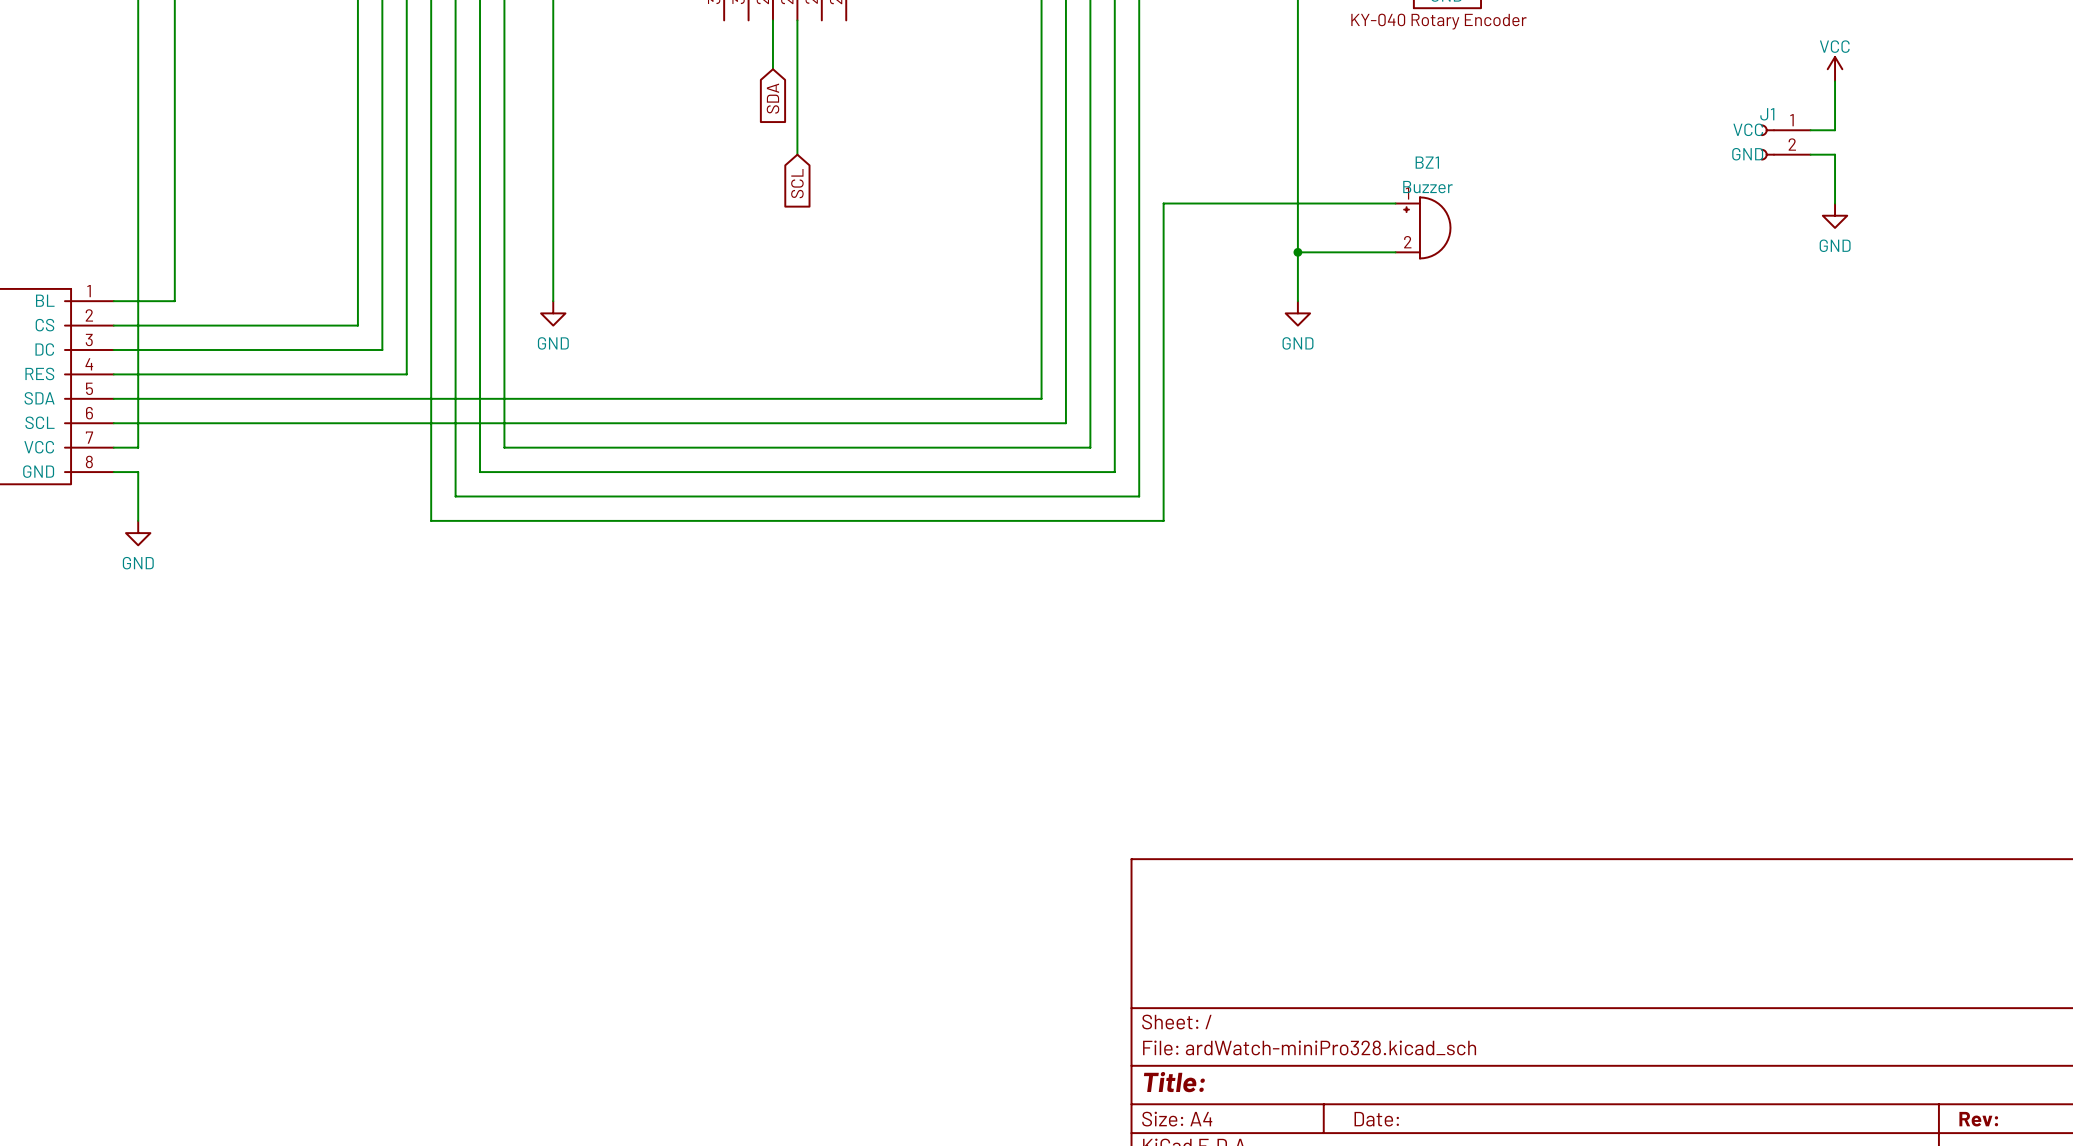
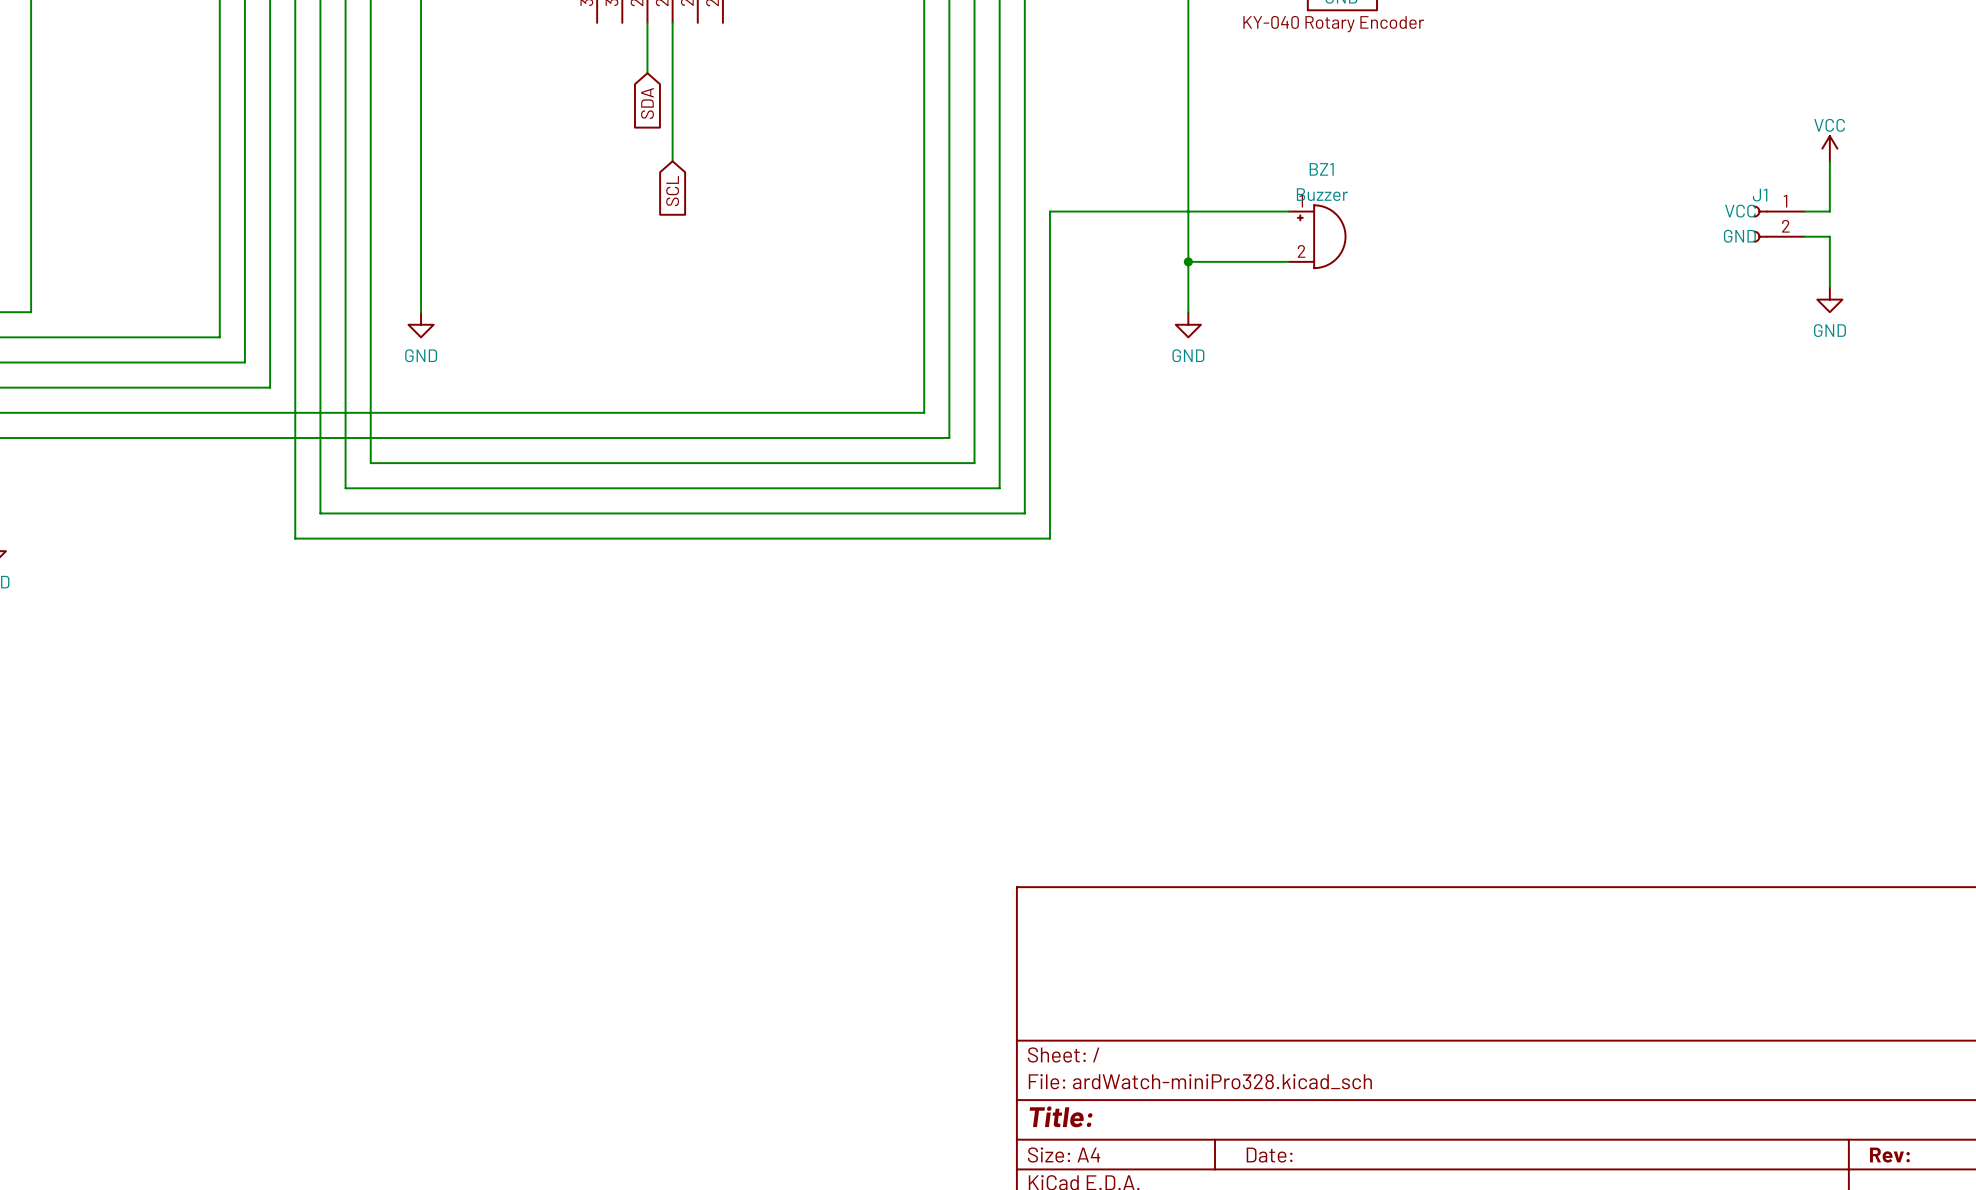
power symbol position: VCC (1835, 69) -> VCC (1829, 148)
wire: (1835, 81) (1835, 130) (1810, 130) -> (1829, 161) (1829, 211) (1804, 211)
J1 position: (1785, 142) -> (1779, 224)
wire: (1810, 154) (1835, 154) (1835, 203) -> (1804, 236) (1829, 236) (1829, 287)
power symbol position: GND (1835, 215) -> GND (1829, 299)

